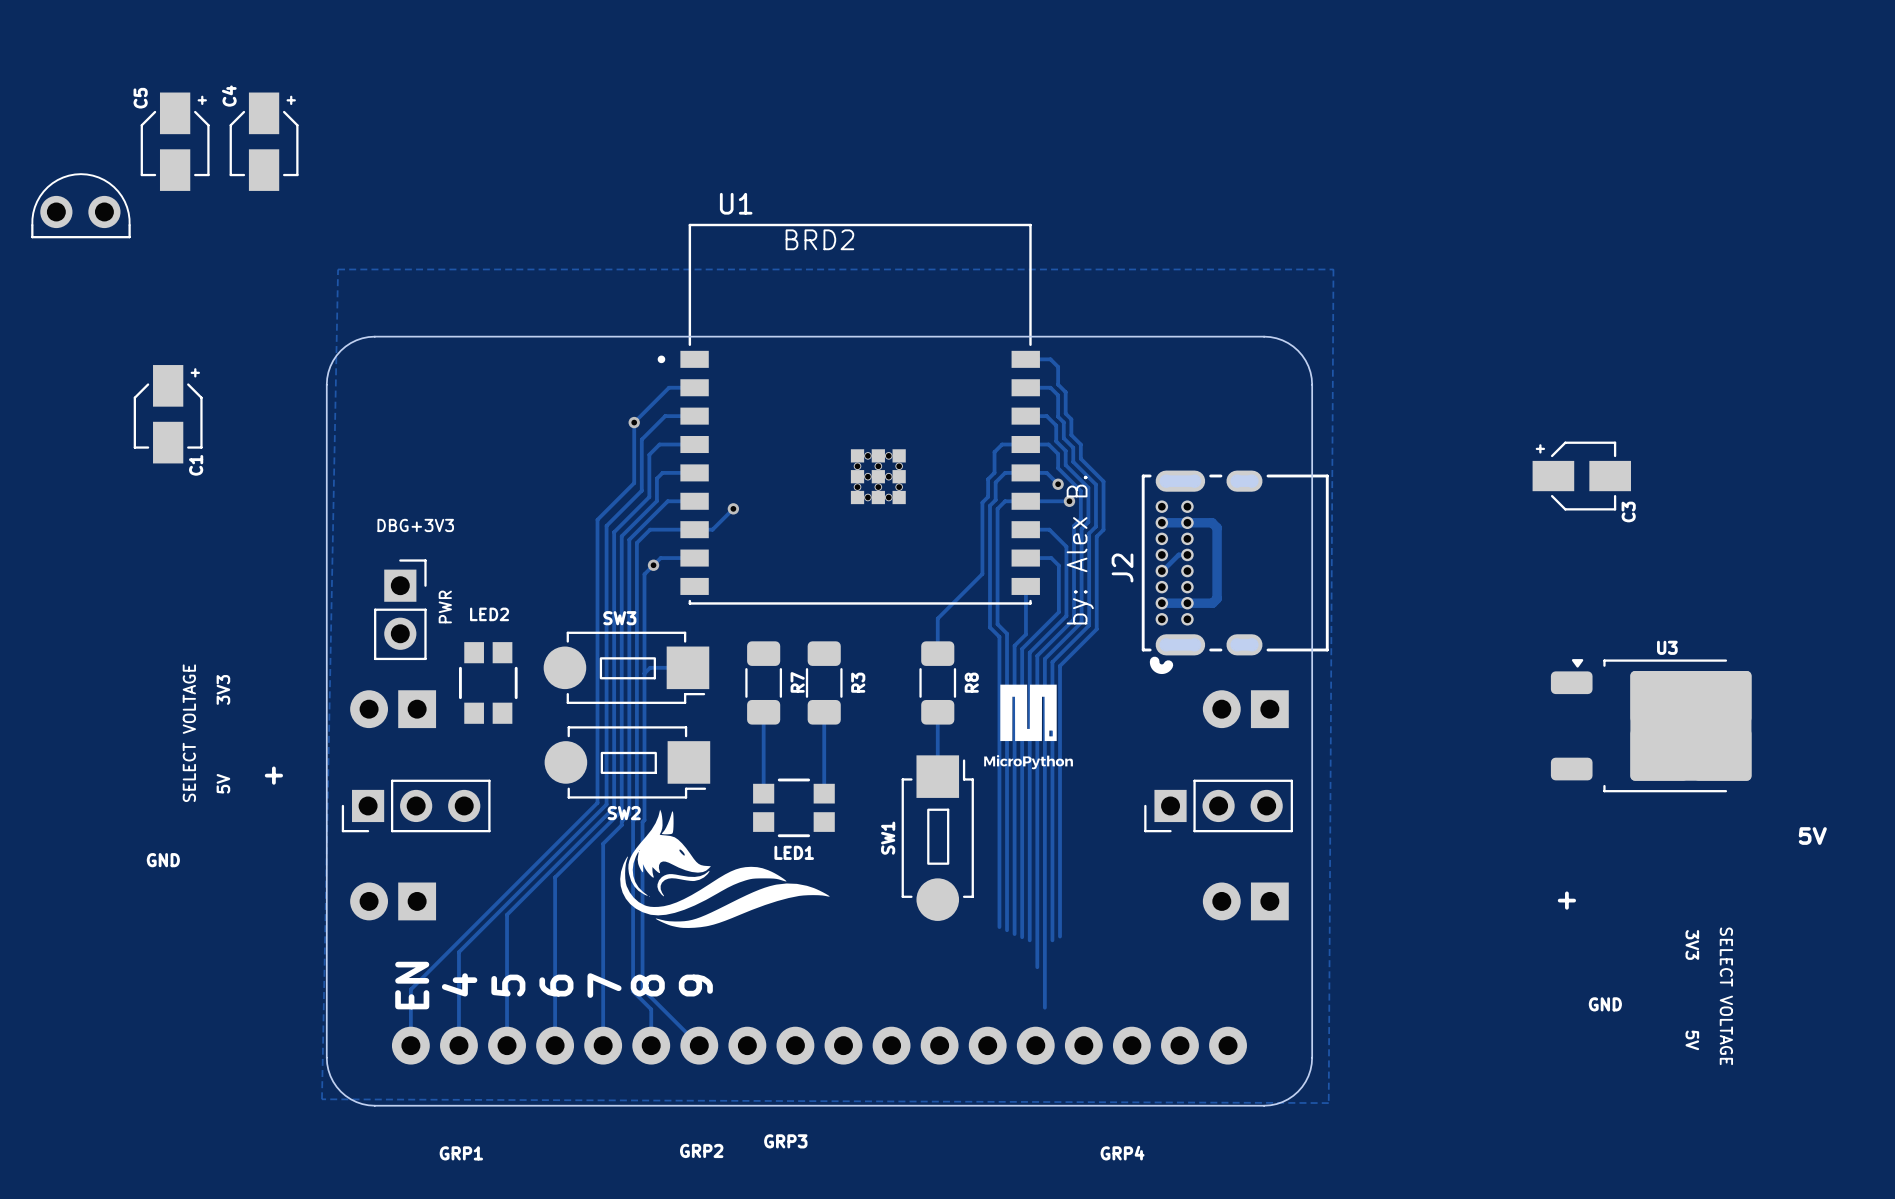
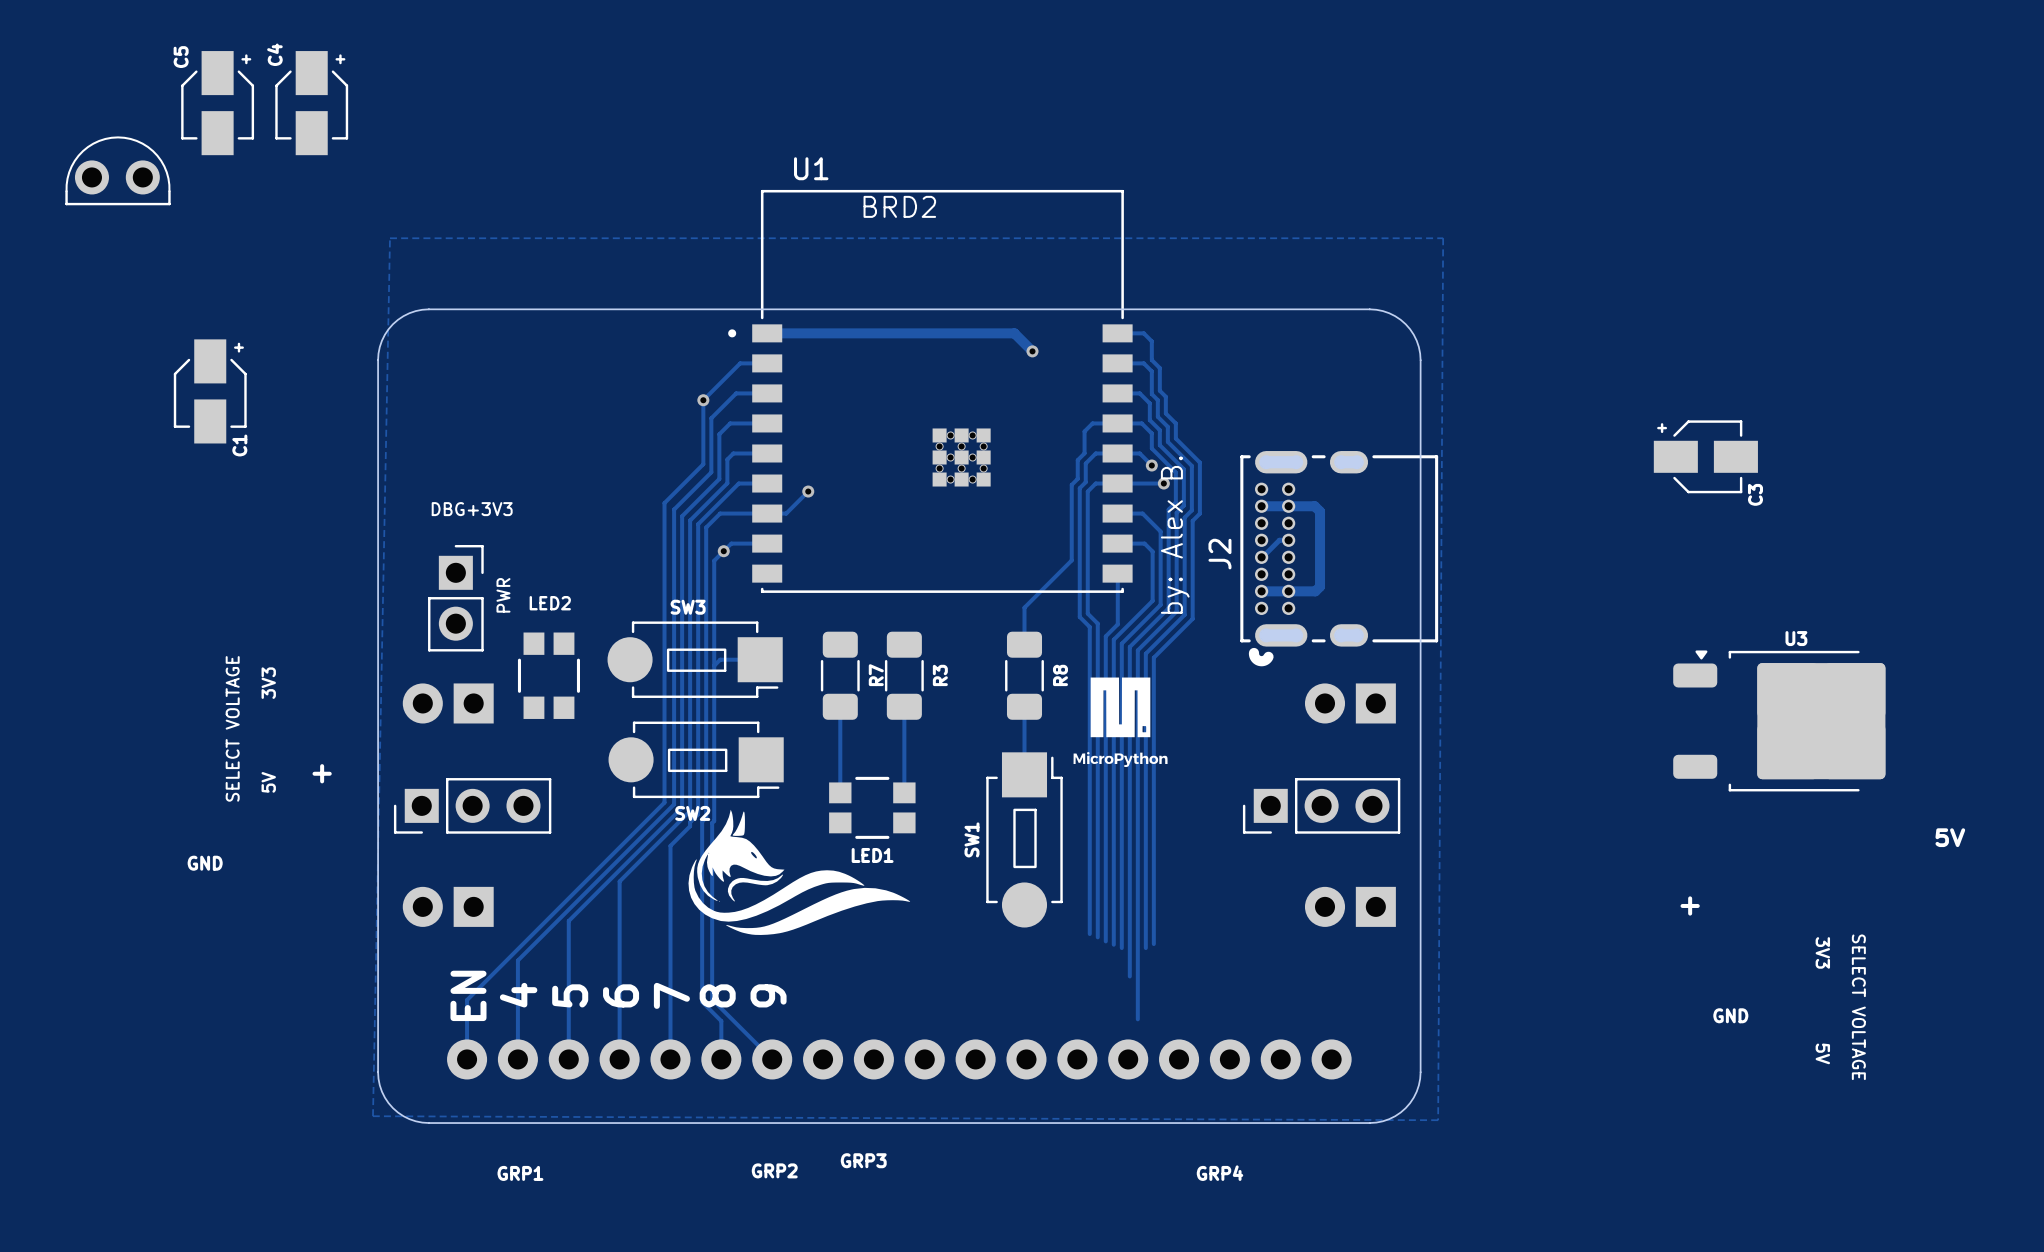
track: none -> (767, 333) (1014, 333) (1032, 351)
via: none -> (1032, 351)

